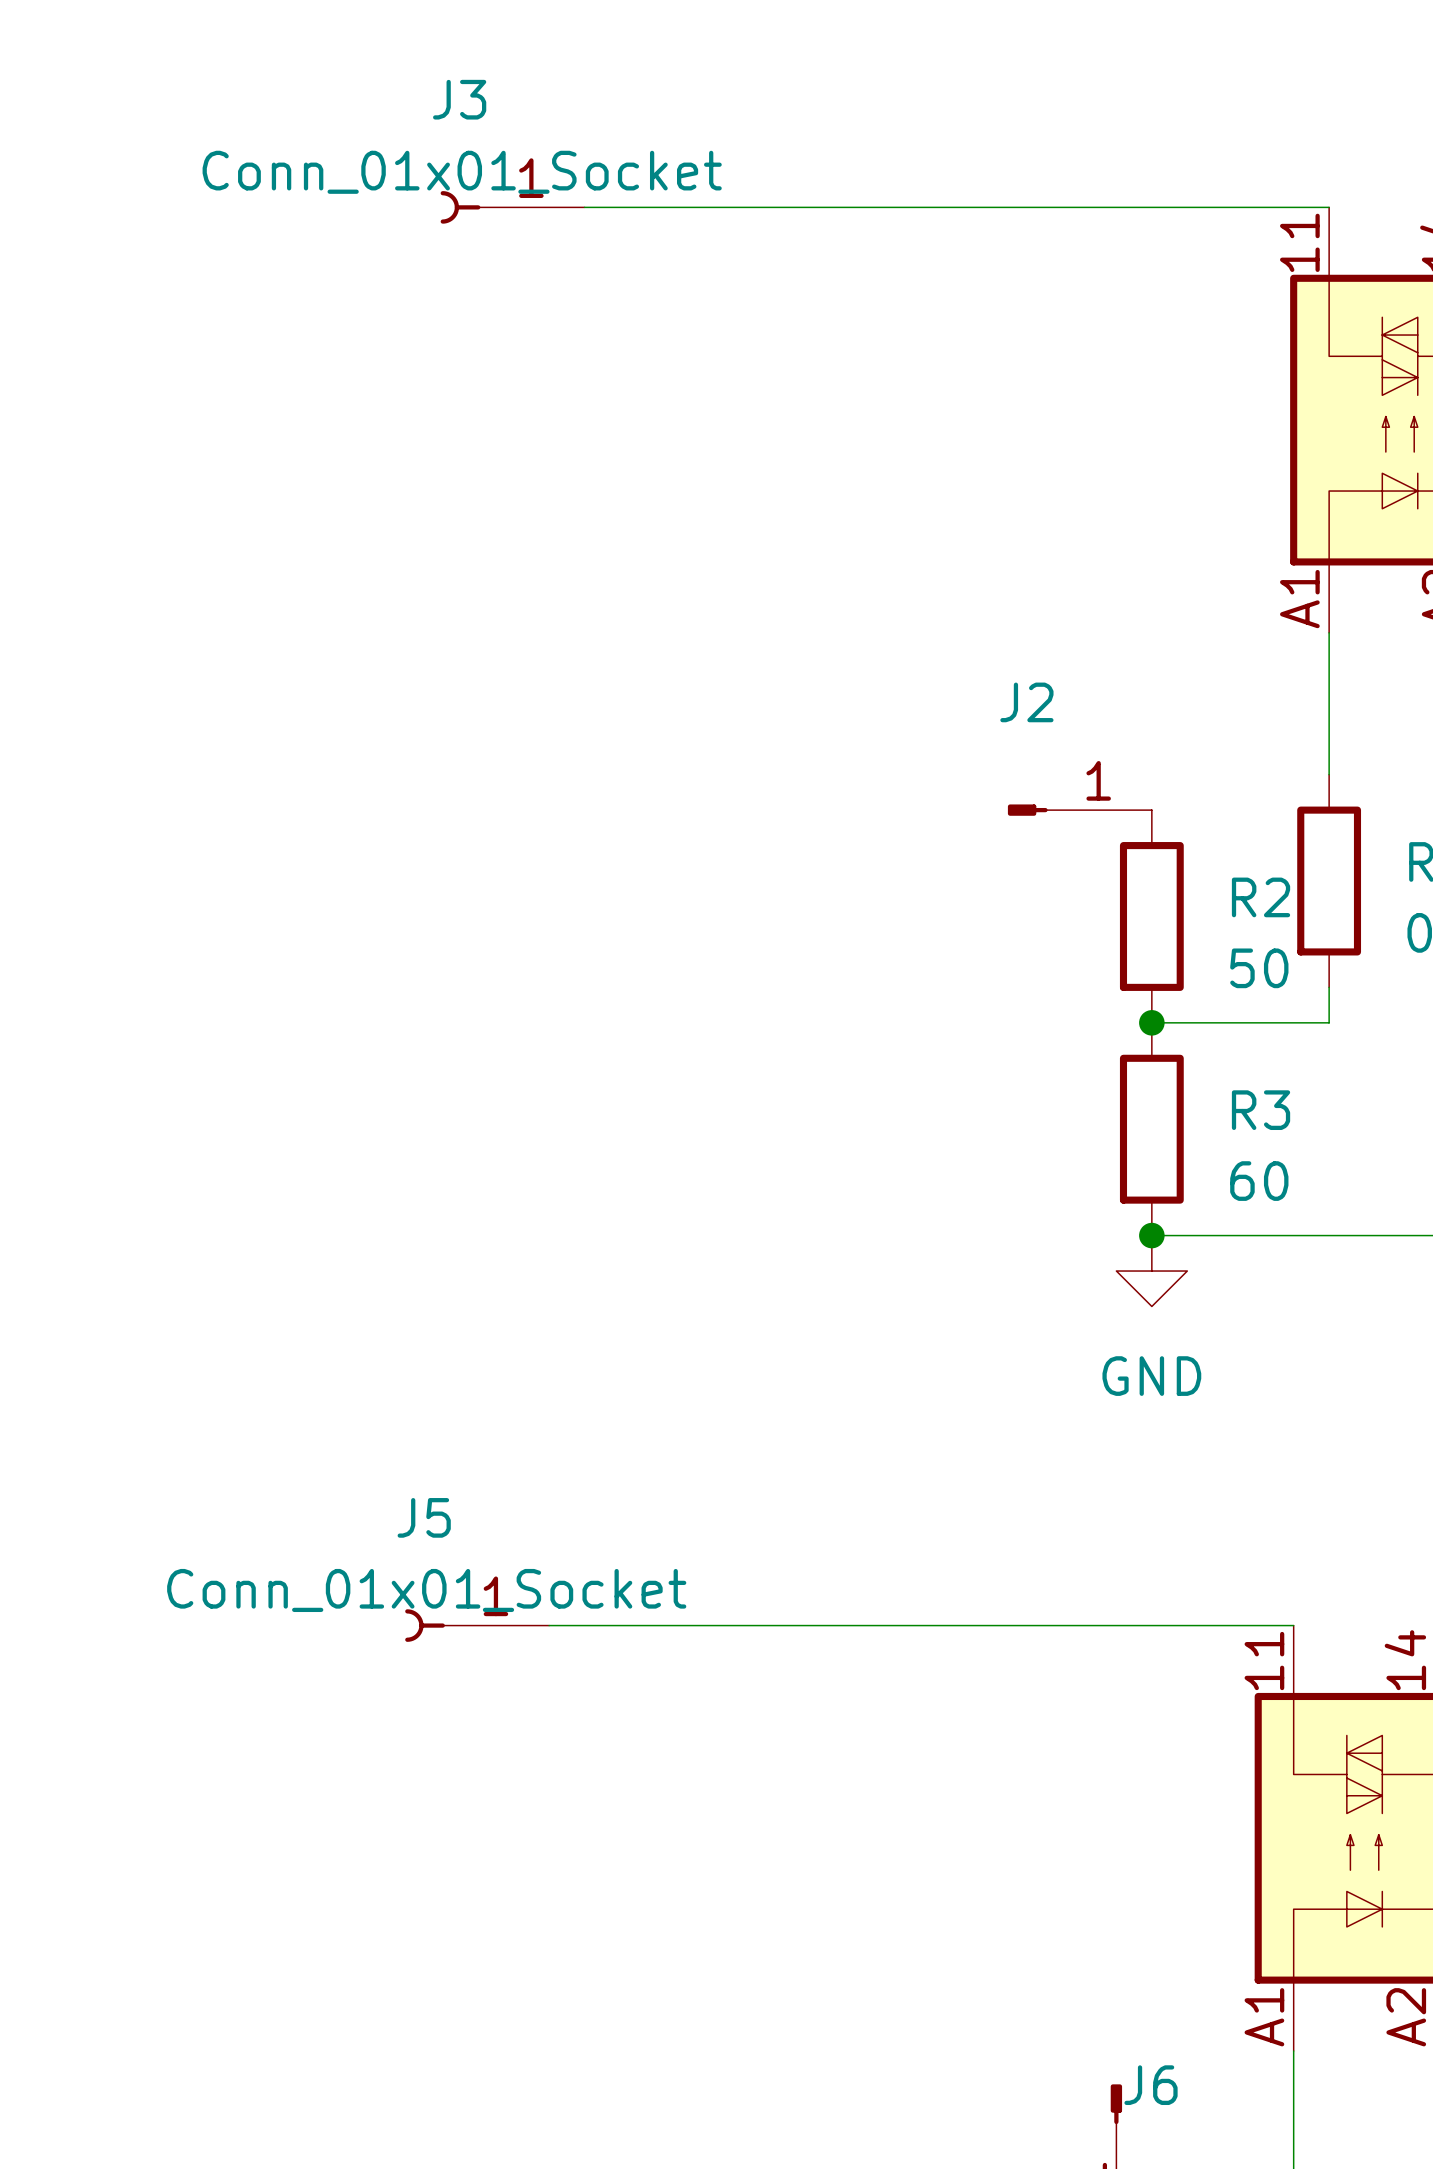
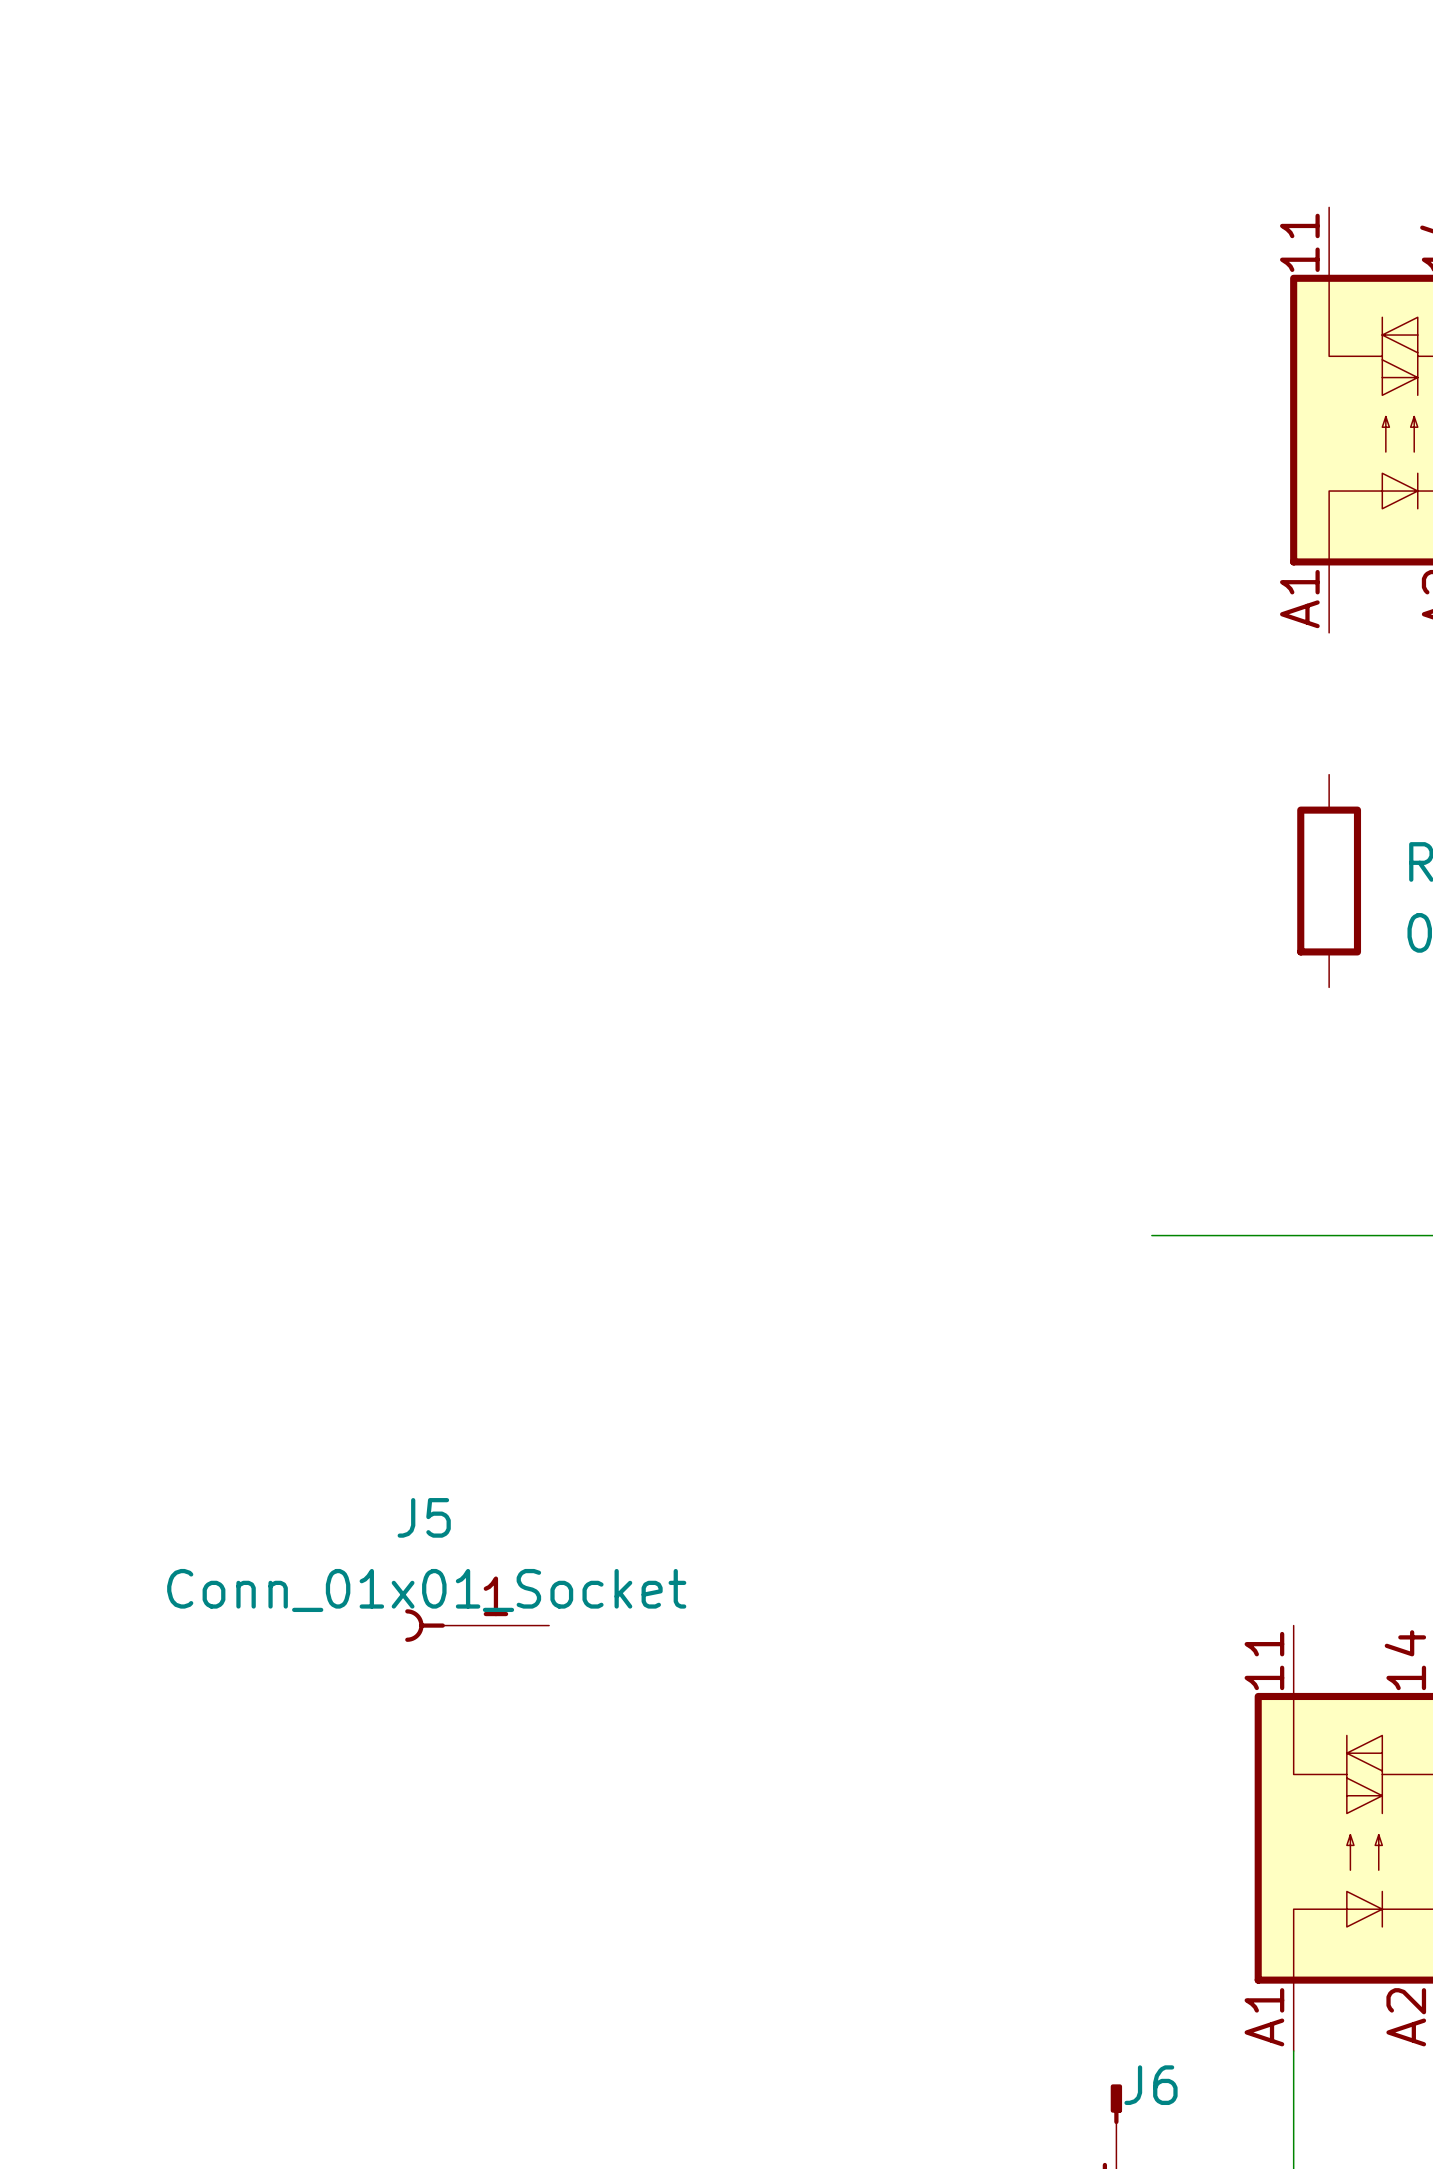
J3: Conn_01x01_Socket (512, 207) -> none
wire: (584, 207) (1329, 207) -> none
wire: (1329, 632) (1329, 774) -> none
J2: (1079, 810) -> none
R2: 50 (1151, 916) -> none
wire: (1329, 987) (1329, 1022) (1151, 1022) -> none
junction: (1151, 1022) -> none
R3: 60 (1151, 1129) -> none
junction: (1151, 1235) -> none
power symbol: GND (1151, 1271) -> none
wire: (549, 1625) (1293, 1625) -> none

